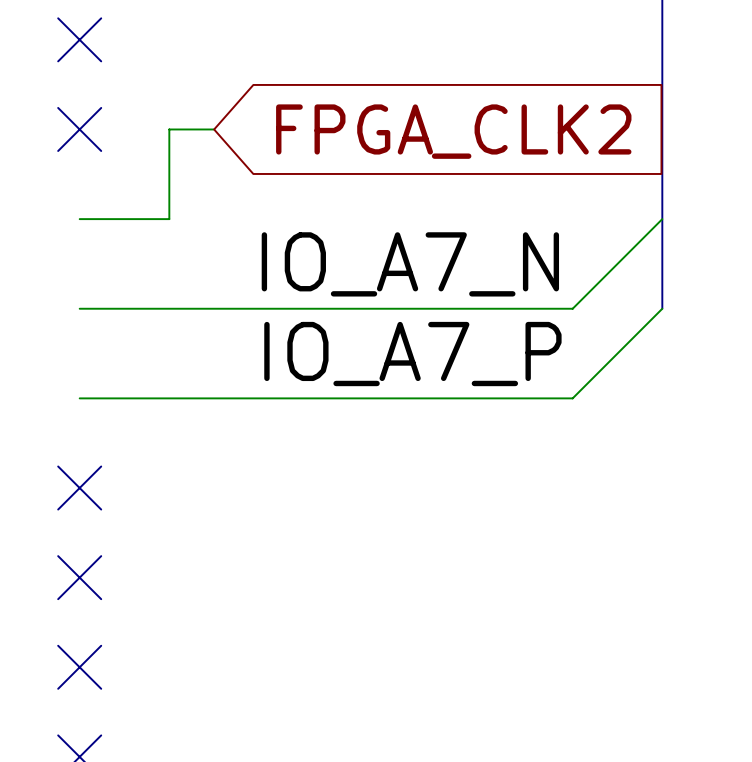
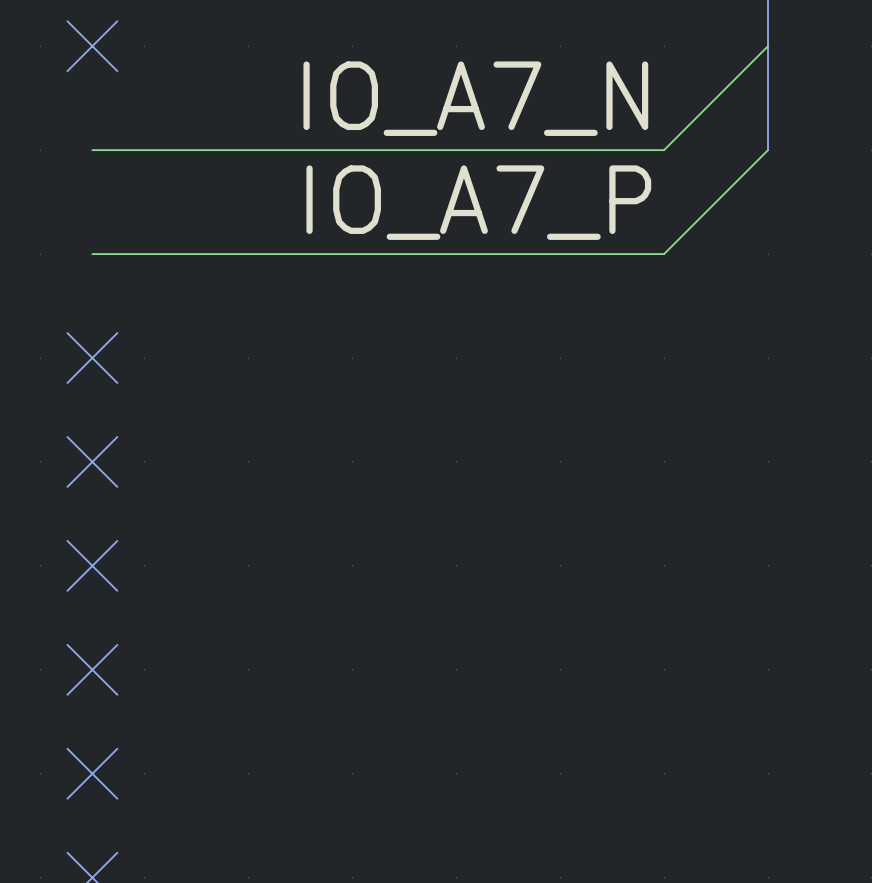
wire: none -> (768, 46) (664, 150) (248, 150)
no-connect mark: (79, 129) -> none
wire: (169, 129) (169, 219) -> (196, 150) (92, 150)
wire: none -> (768, 150) (664, 254) (196, 254)
bus: (662, 129) (662, 308) -> none
global label: FPGA_CLK2 (453, 131) -> none
wire: (662, 219) (572, 308) (79, 308) -> none
label position: IO_A7_N (410, 264) -> IO_A7_N (475, 98)
no-connect mark: none -> (92, 358)
wire: (662, 308) (572, 398) (79, 398) -> none
label position: IO_A7_P (412, 354) -> IO_A7_P (478, 202)
no-connect mark: none -> (92, 461)

